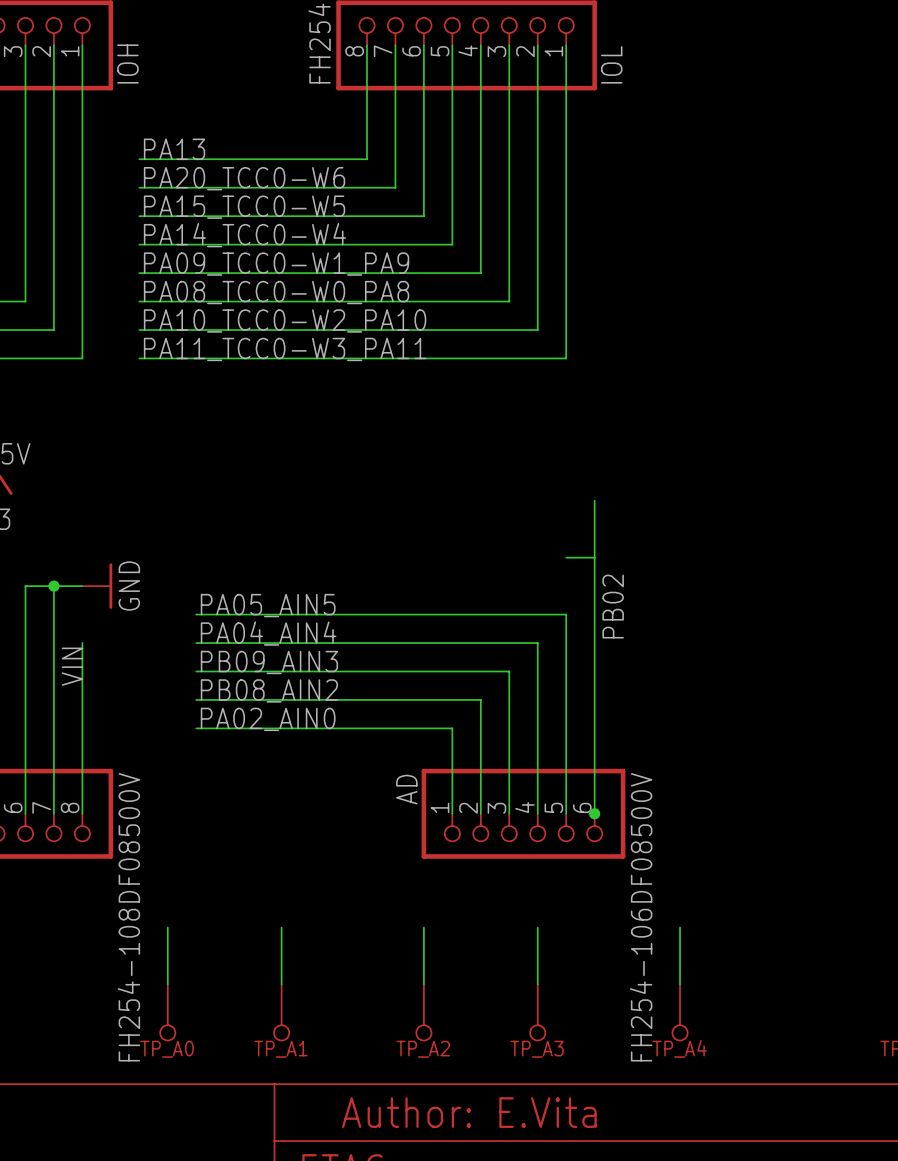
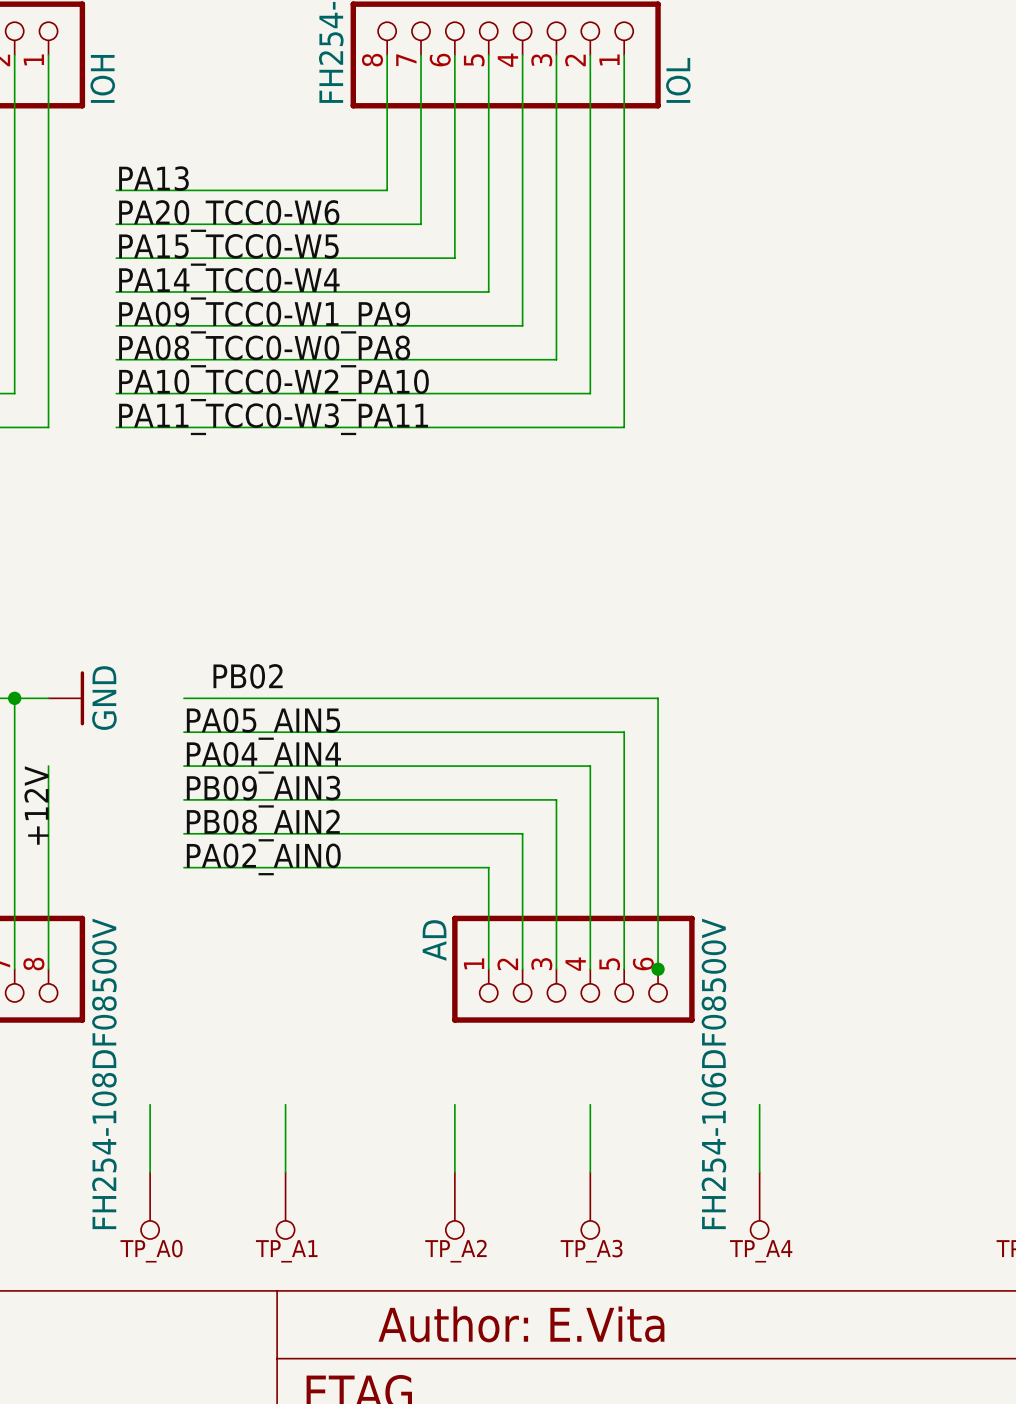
wire: (594, 500) (594, 586) -> (183, 698) (658, 698)
wire: (566, 557) (594, 557) -> none
label: none -> PB02 (248, 676)
label: PB02 (613, 606) -> none
label: VIN (72, 666) -> +12V (36, 805)

